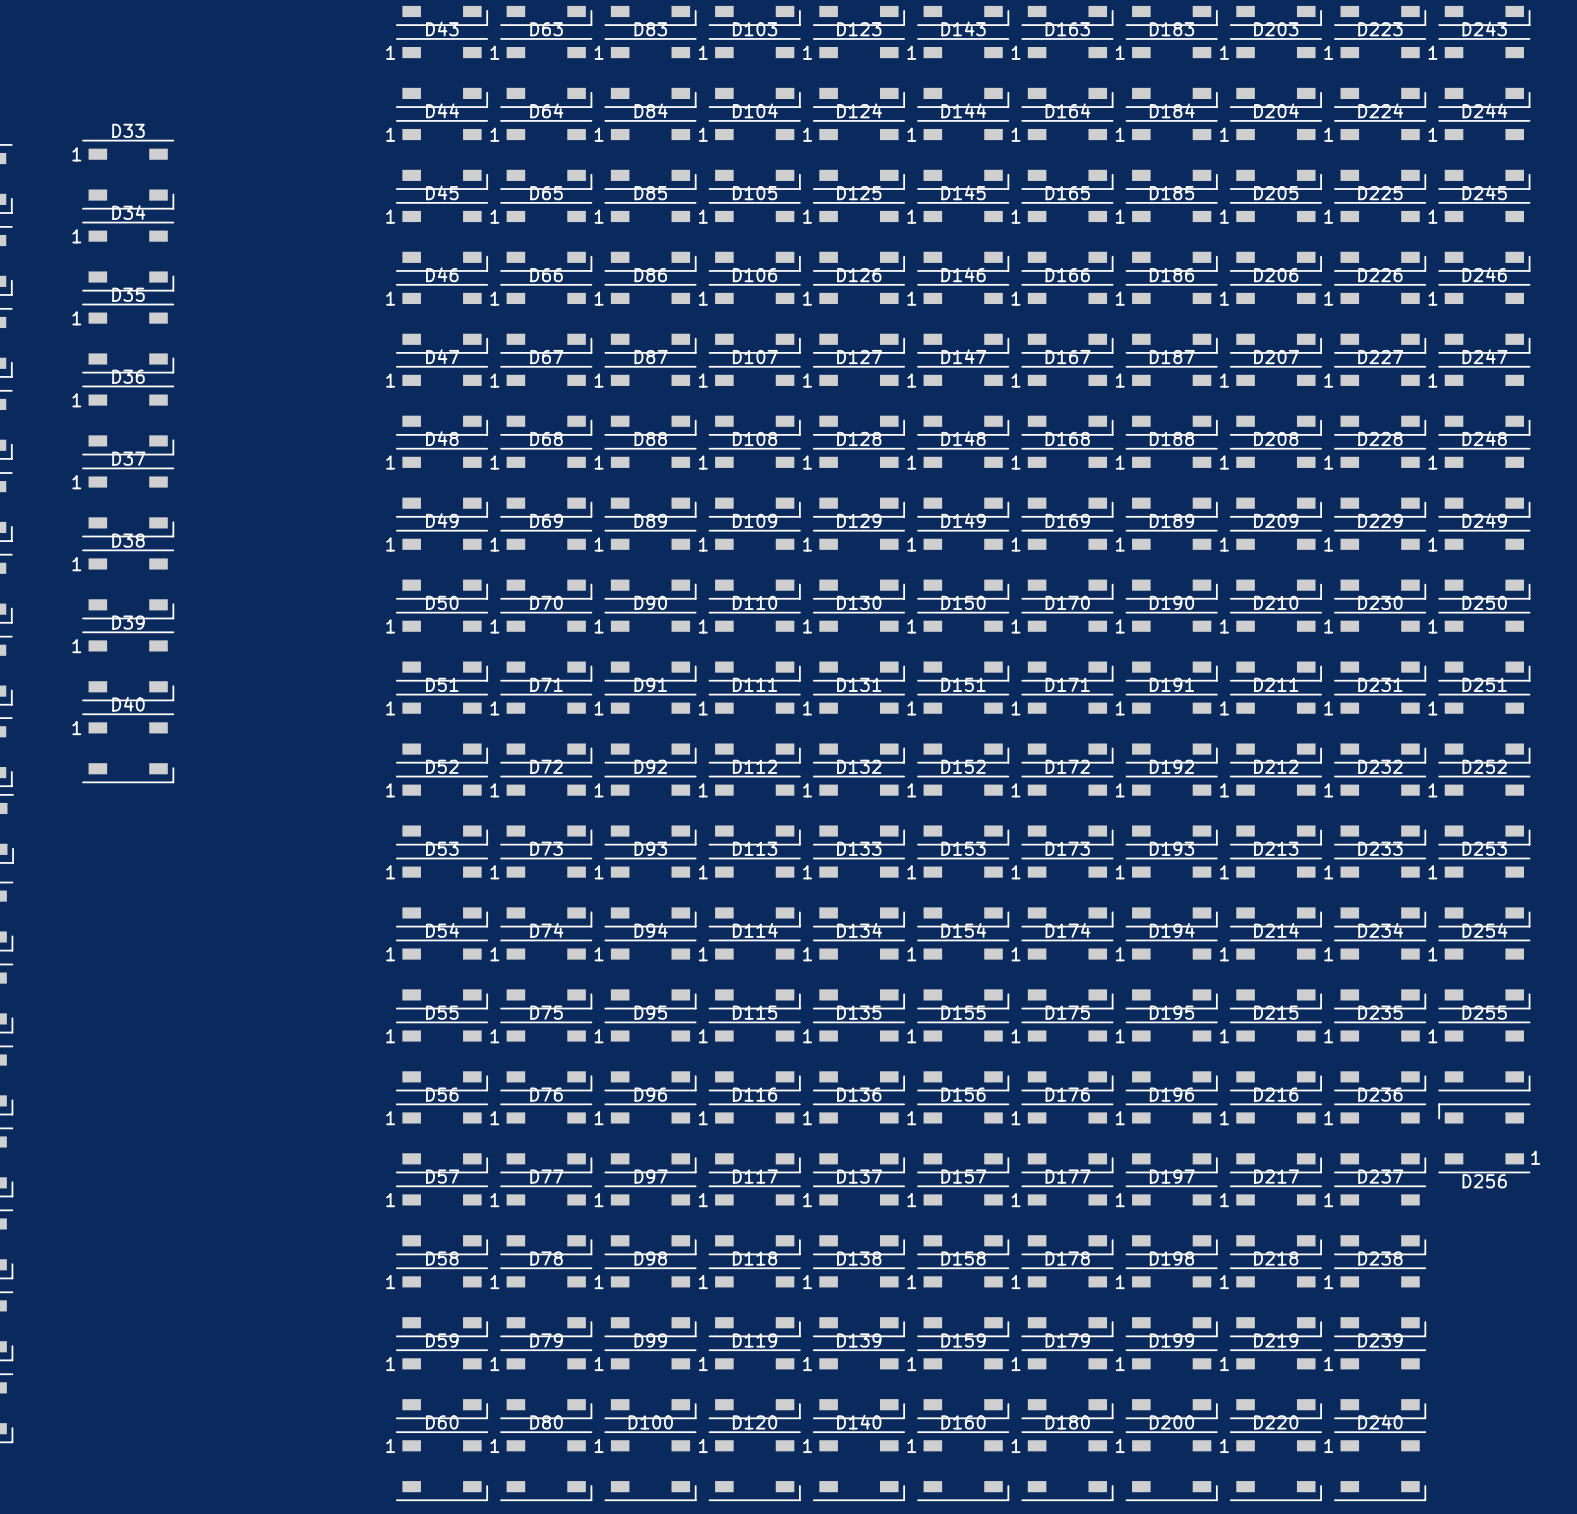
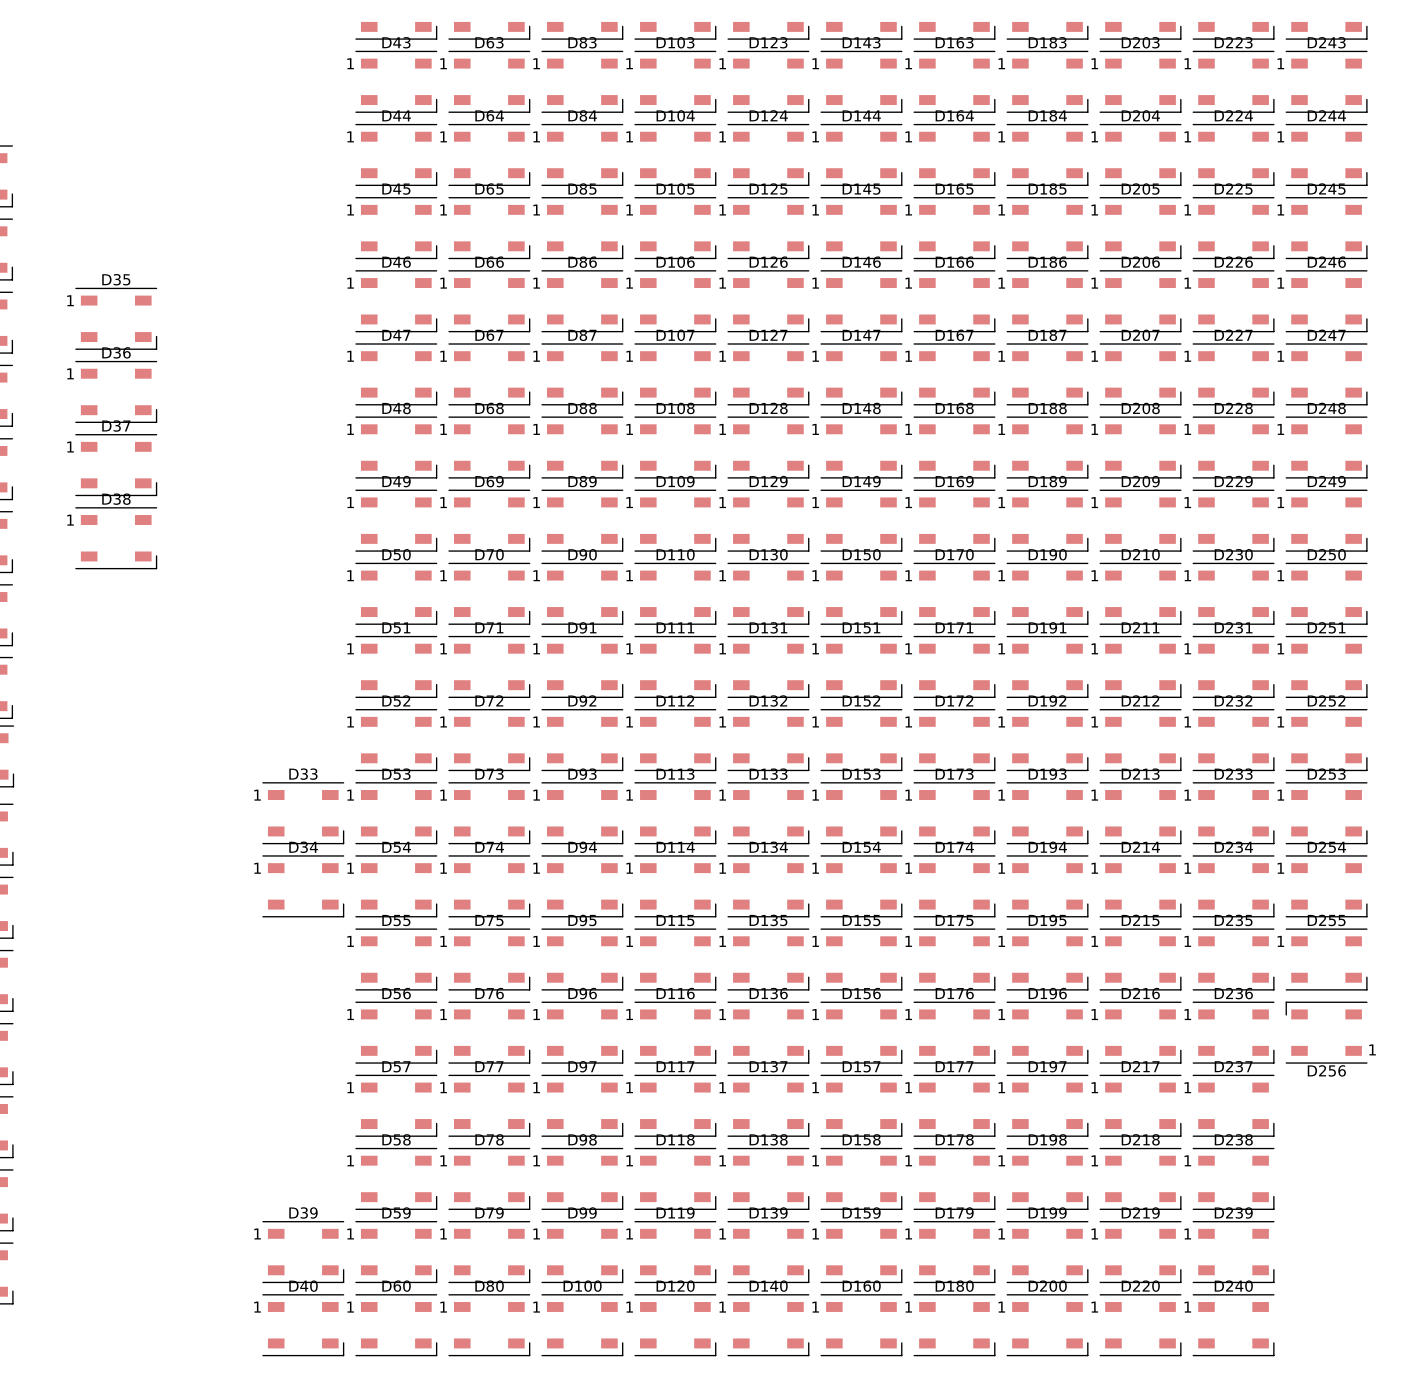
D33 position: (128, 174) -> (303, 813)
D34 position: (128, 256) -> (303, 886)
D39 position: (128, 666) -> (303, 1252)
D40 position: (128, 748) -> (303, 1325)

